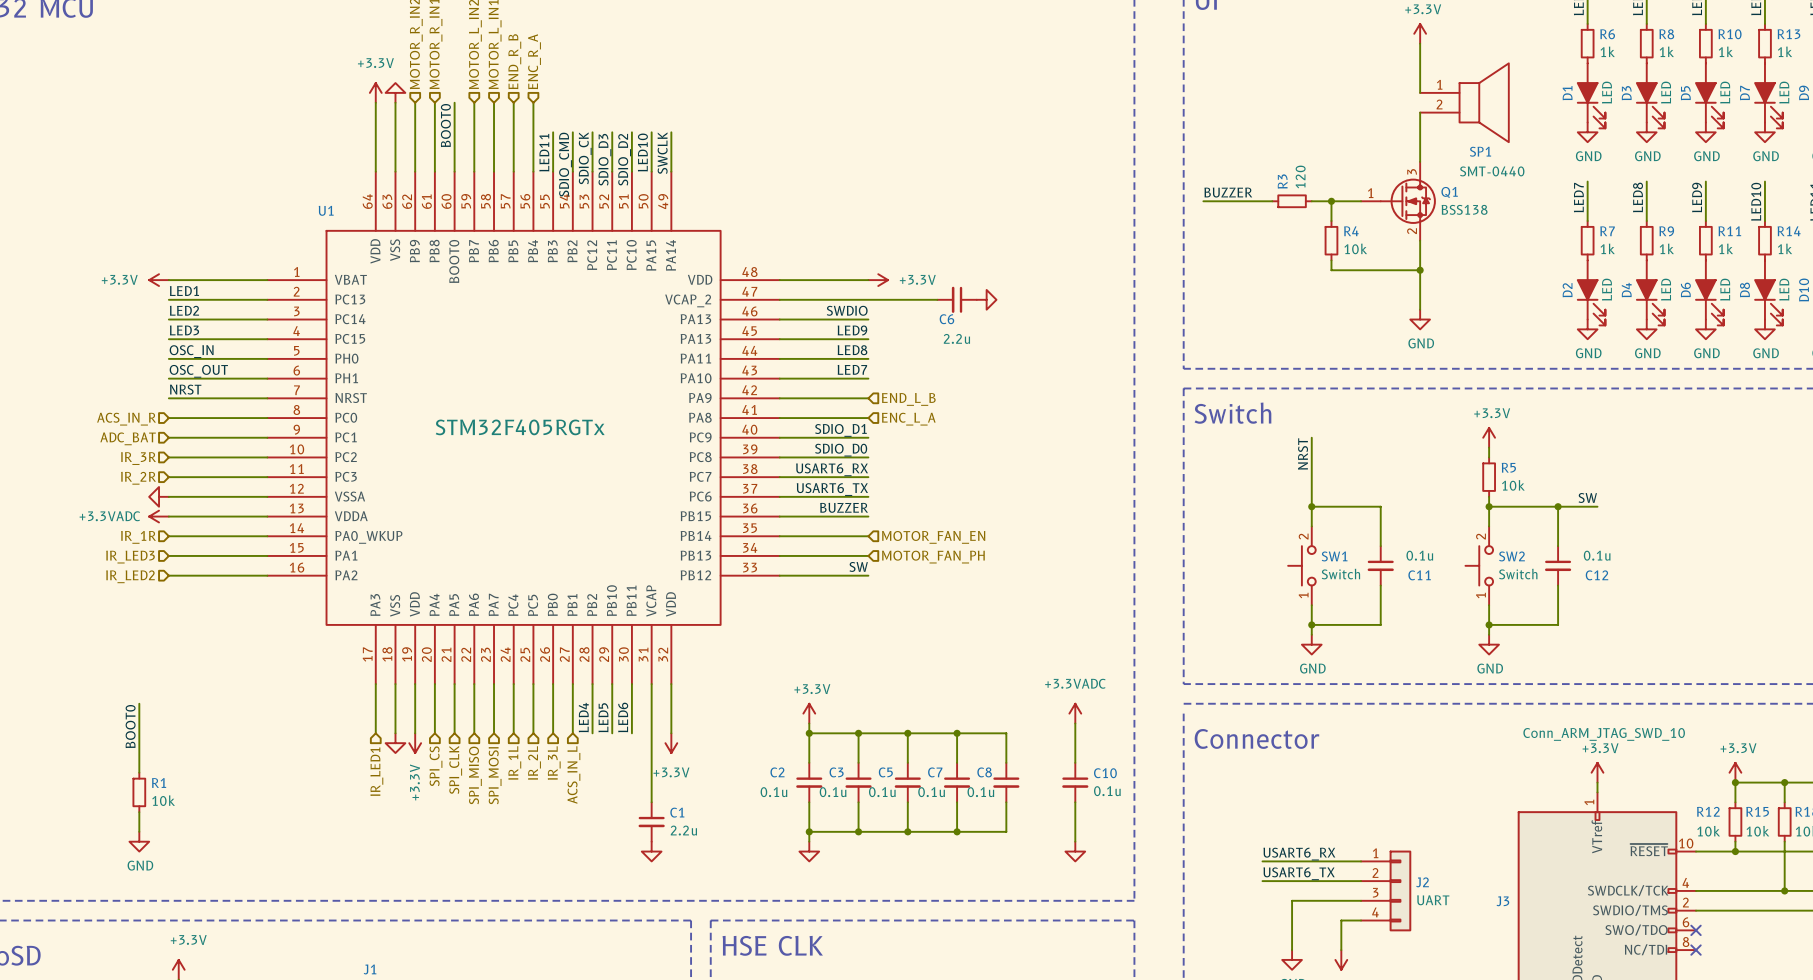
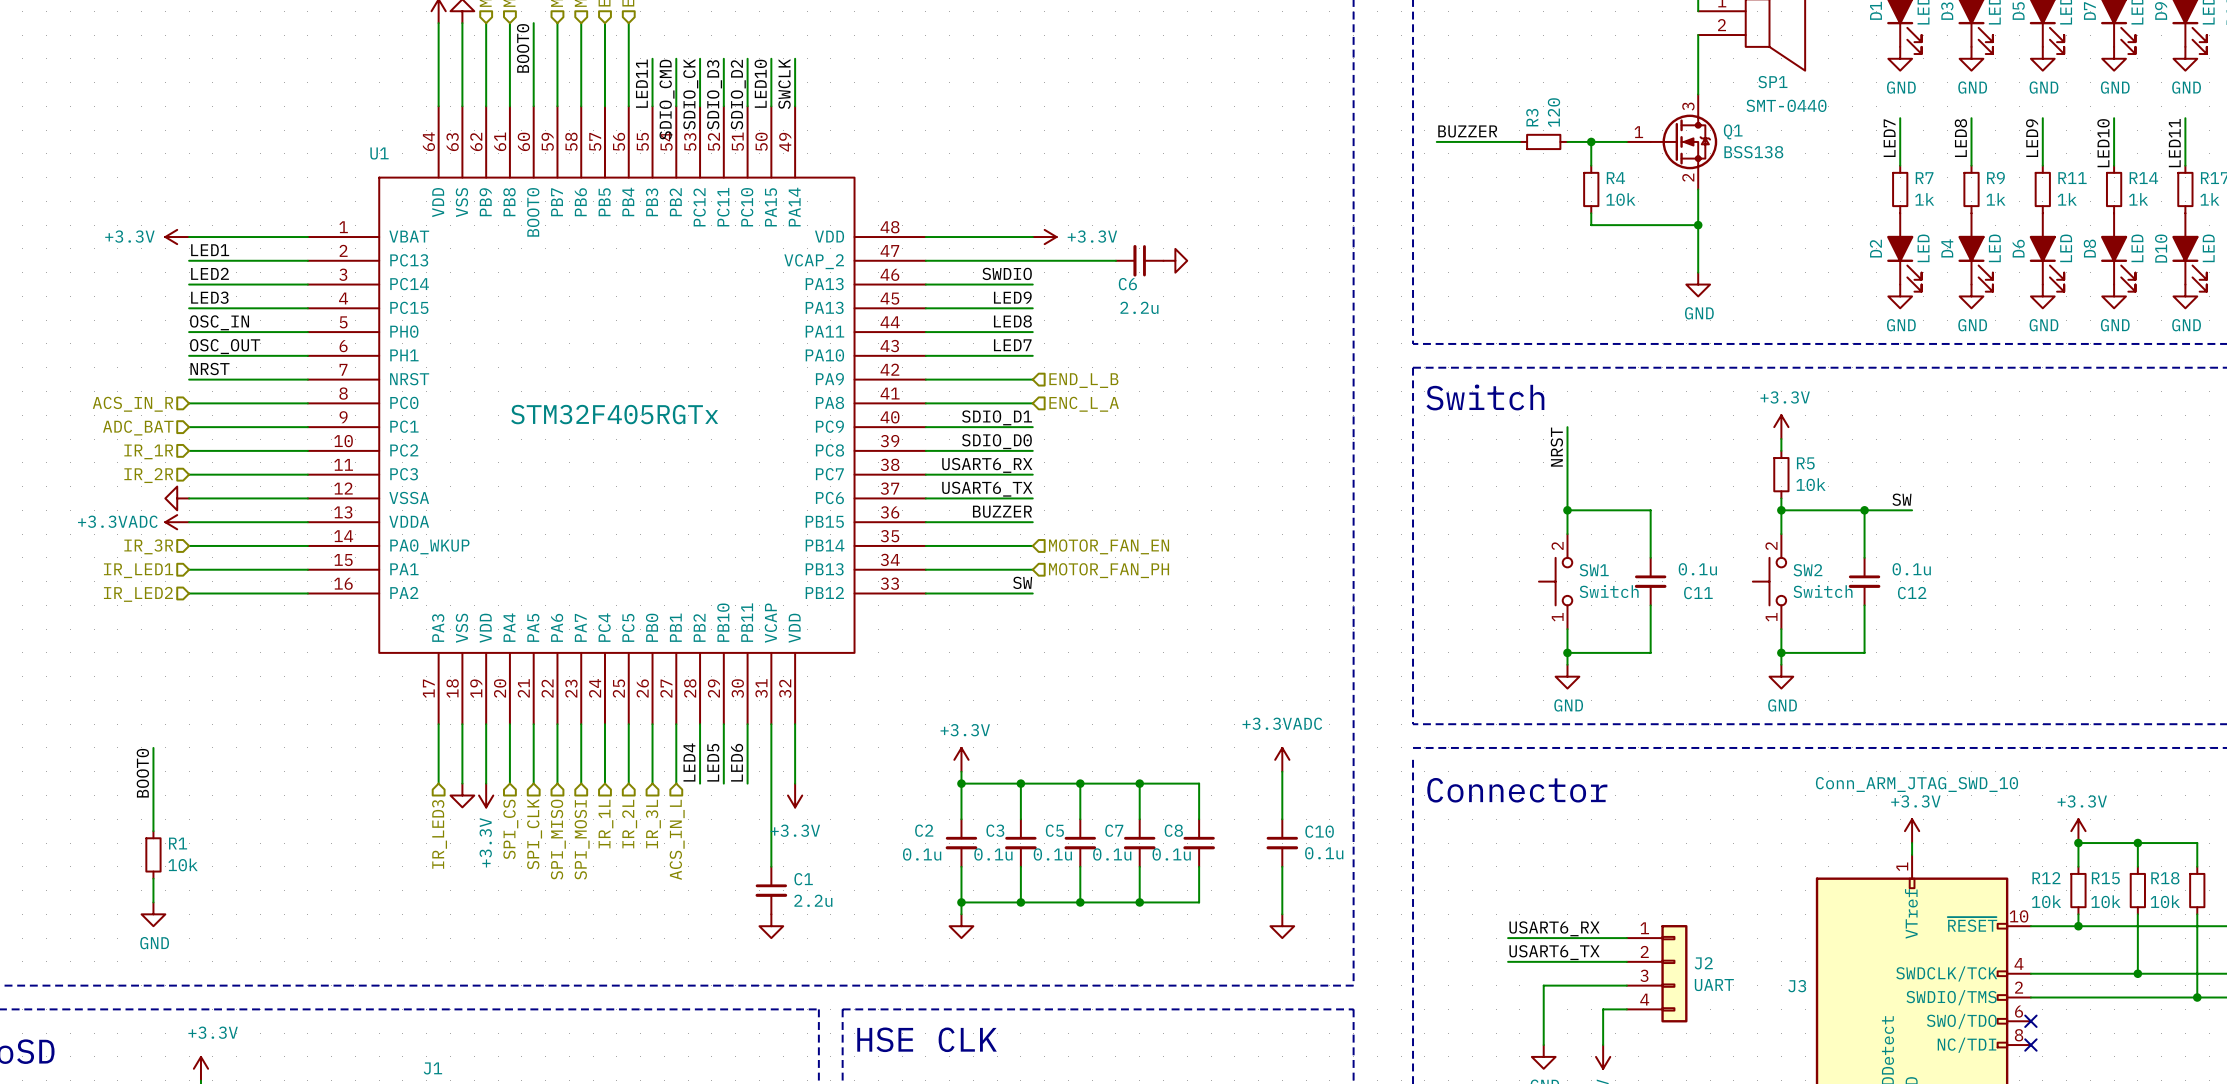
hierarchical label: IR_3R (138, 458) -> IR_1R (148, 451)
hierarchical label: IR_1R (138, 537) -> IR_3R (148, 546)
hierarchical label: IR_LED3 (130, 557) -> IR_LED1 (138, 570)
hierarchical label: IR_LED1 (376, 771) -> IR_LED3 (439, 834)

